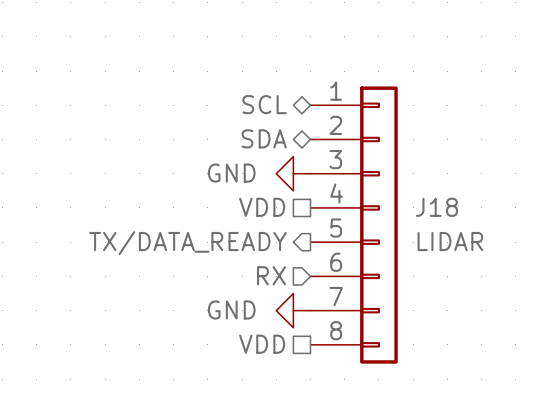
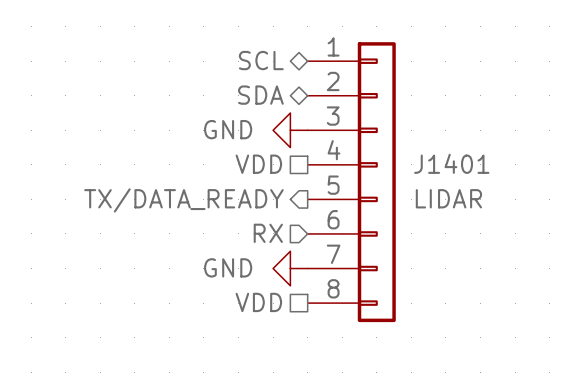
J18 name: J18 (436, 207) -> J1401 (451, 163)

